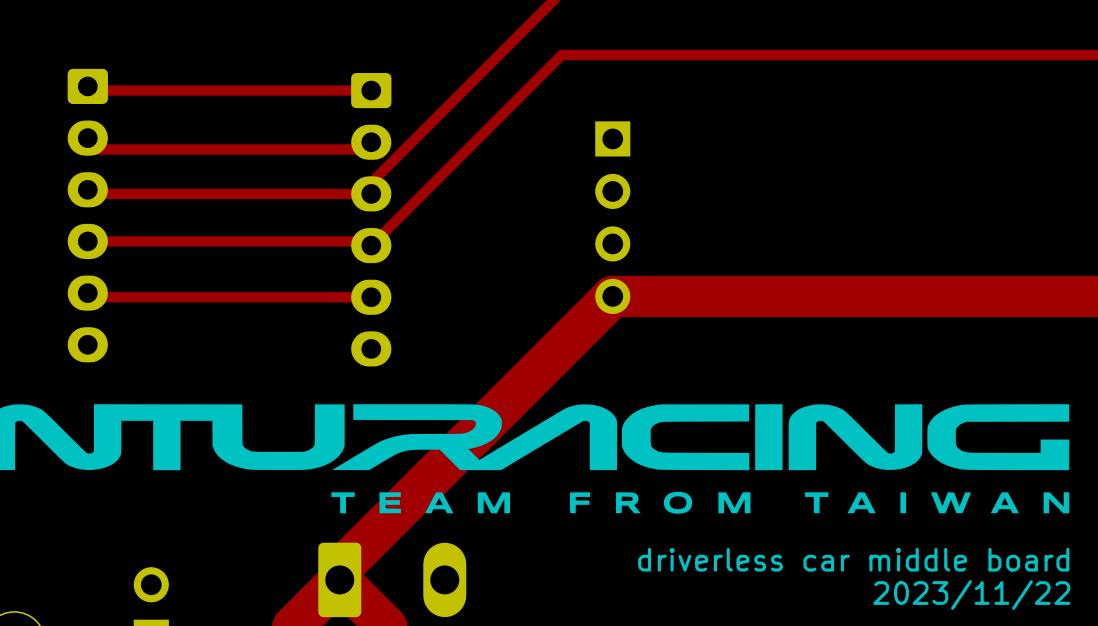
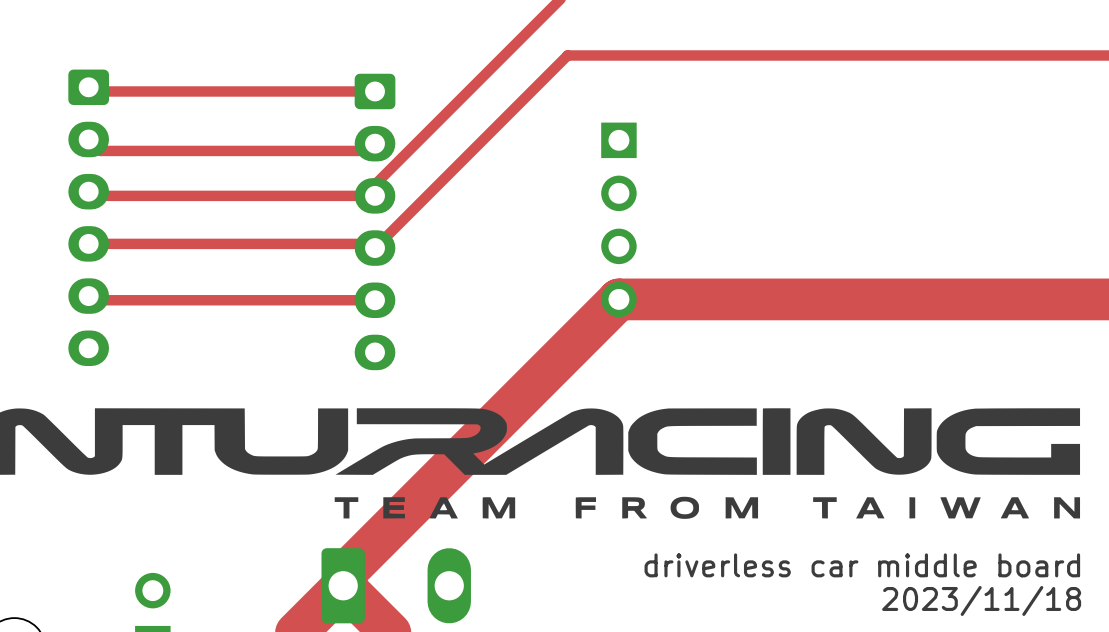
text: 2023/11/22 (971, 594) -> 2023/11/18 (981, 600)

